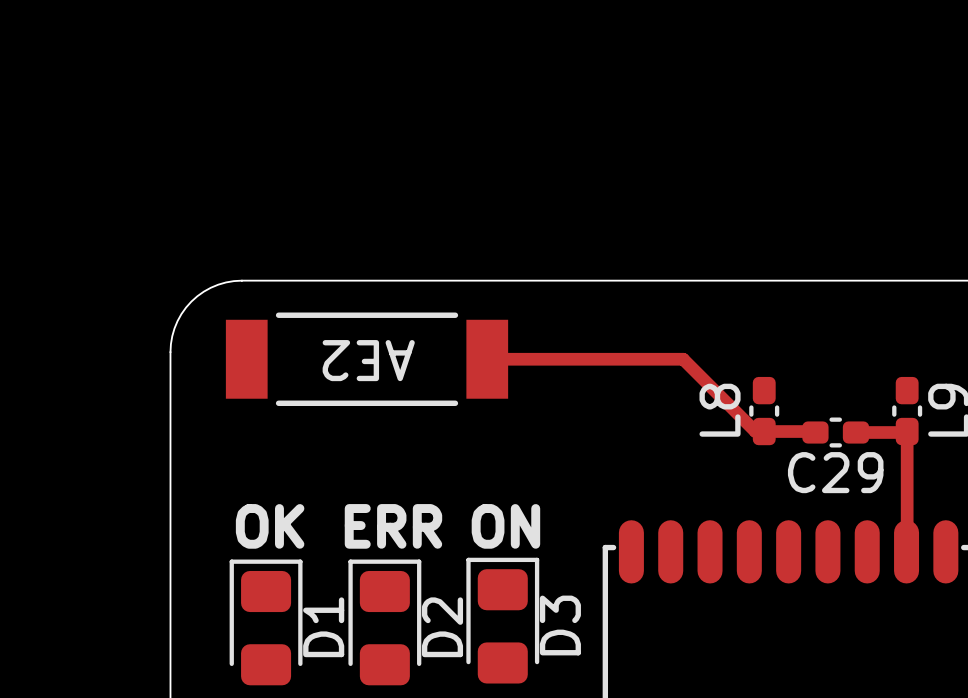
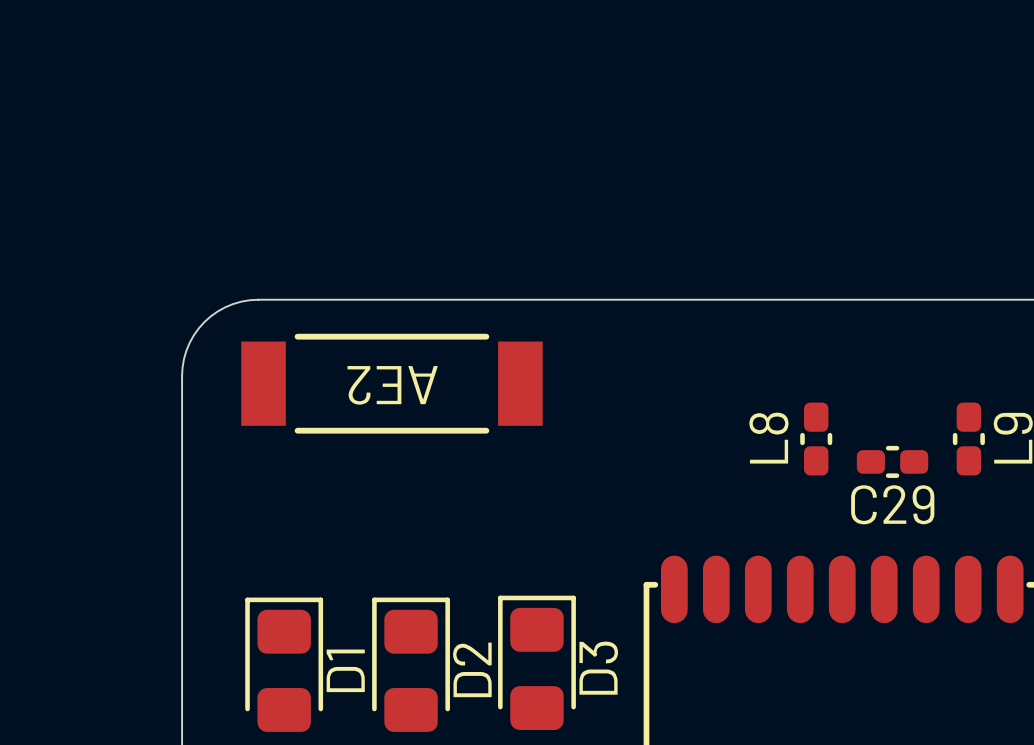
track: (487, 359) (683, 359) (755, 431) (815, 432) -> none
track: (855, 432) (907, 431) (906, 551) -> none
text: OK (270, 526) -> none
text: ERR (393, 526) -> none
text: ON (505, 526) -> none

